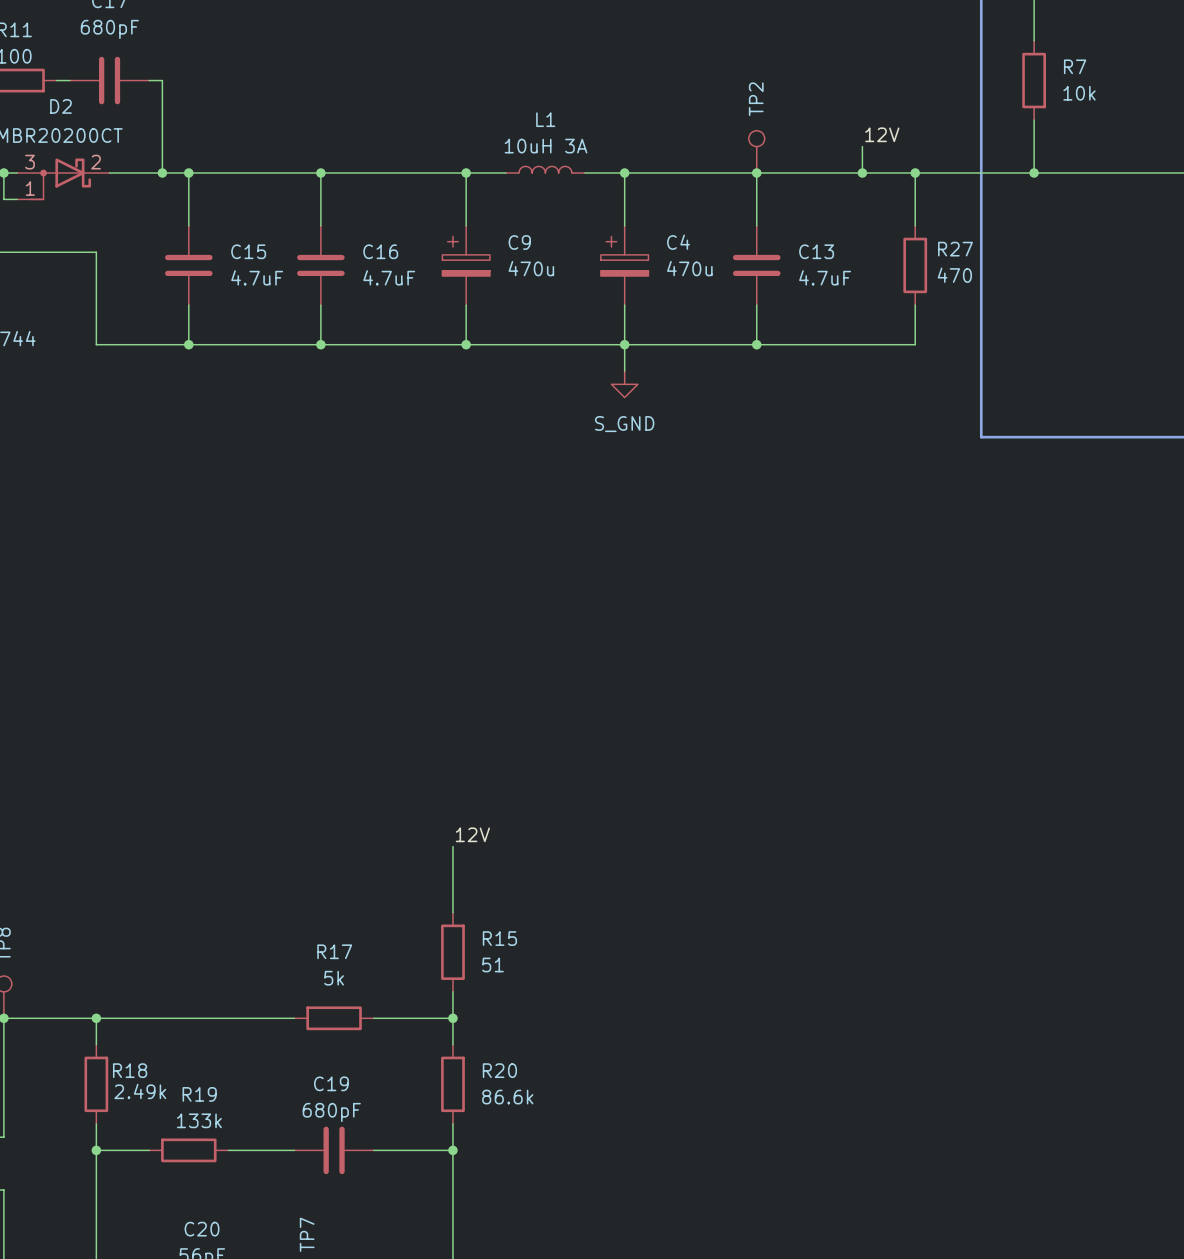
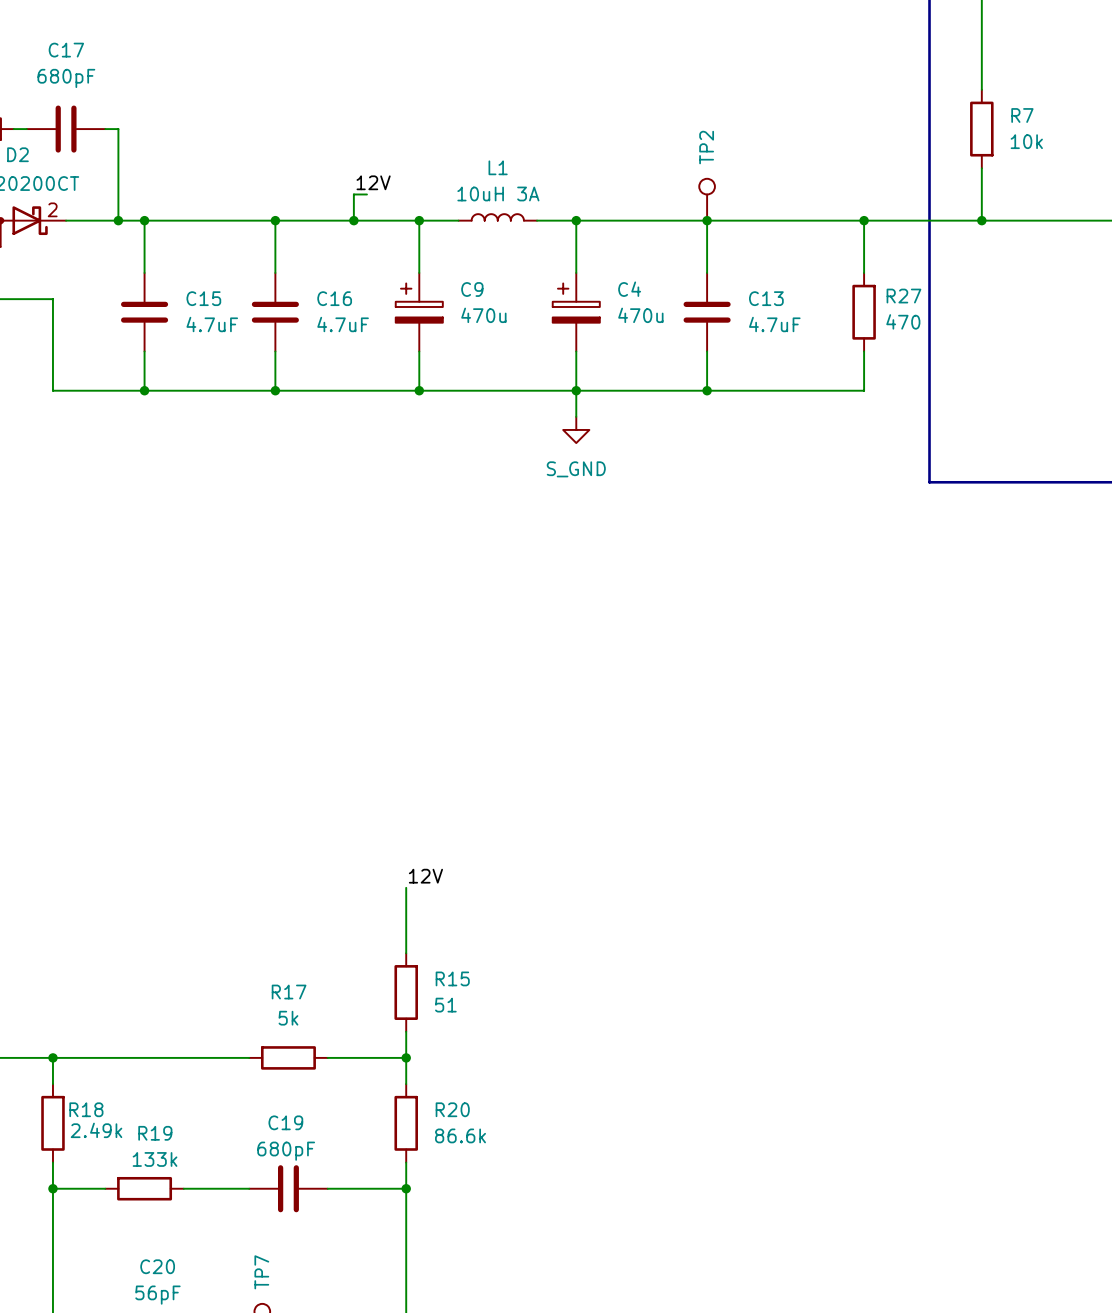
label: none -> 12V (373, 182)
label: 12V (882, 134) -> none
wire: none -> (366, 194) (353, 194) (353, 220)
wire: (862, 146) (862, 173) -> none
junction: none -> (353, 220)
junction: (862, 173) -> none

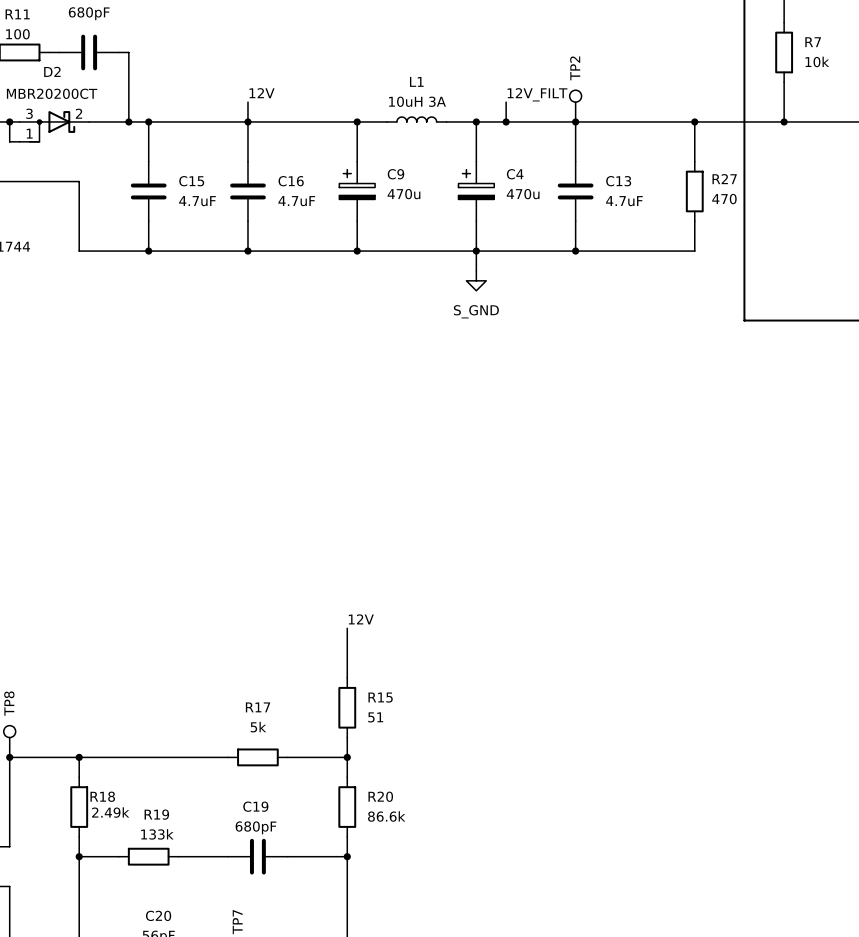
label position: 12V (373, 182) -> 12V (262, 93)
label: none -> 12V_FILT (537, 94)
wire: none -> (247, 102) (247, 121)
wire: (366, 194) (353, 194) (353, 220) -> none
wire: none -> (506, 102) (506, 121)
junction: (353, 220) -> none
junction: none -> (506, 121)

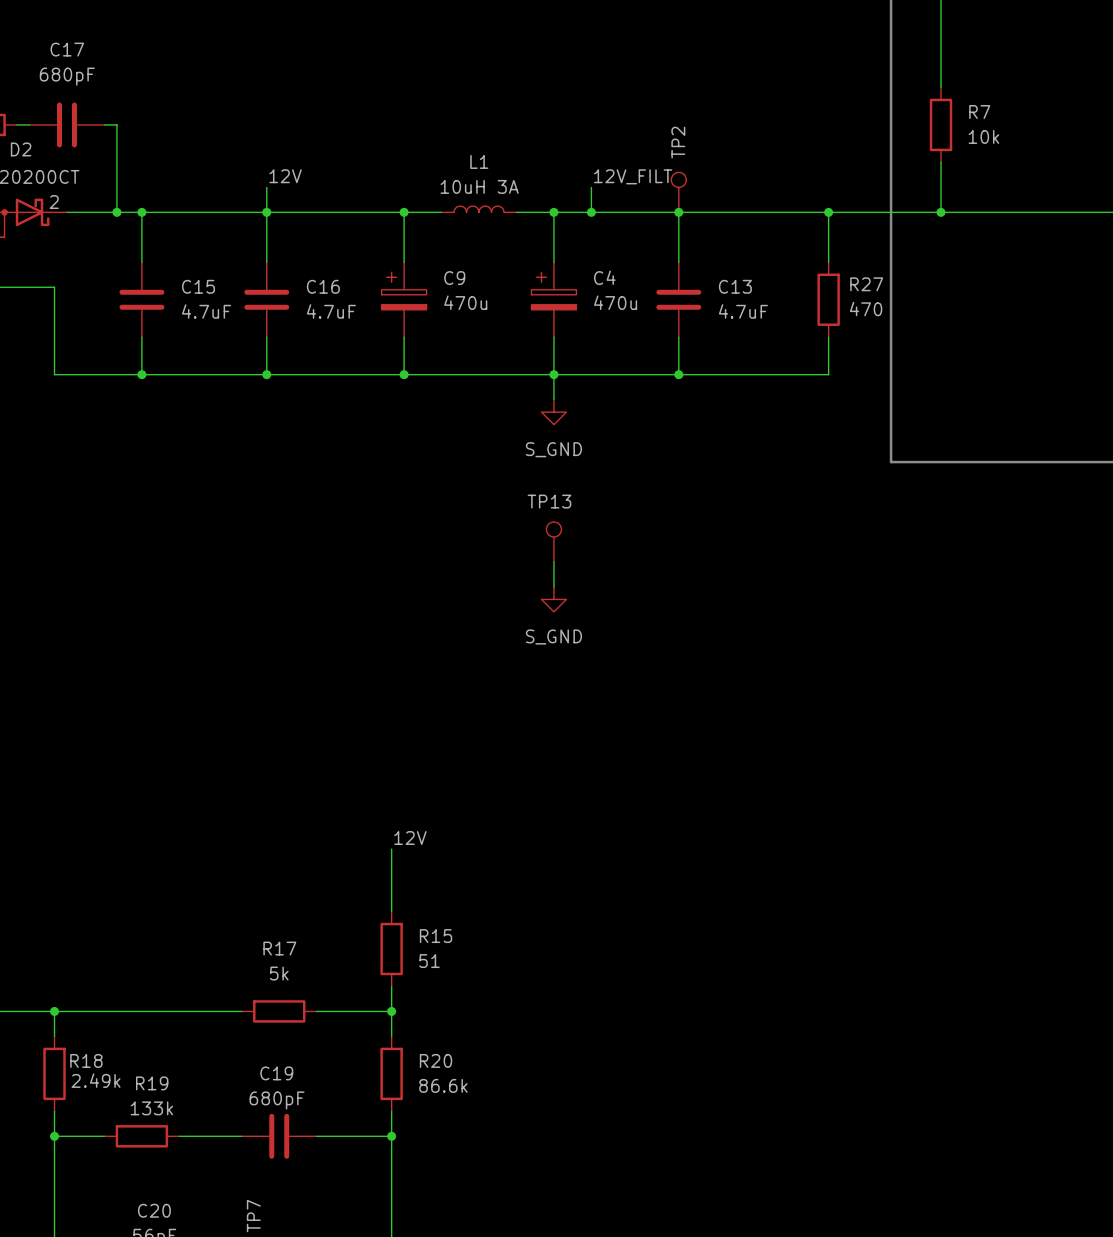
TP13: none -> (553, 541)
wire: none -> (553, 561) (553, 586)
power symbol: none -> S_GND (553, 599)

